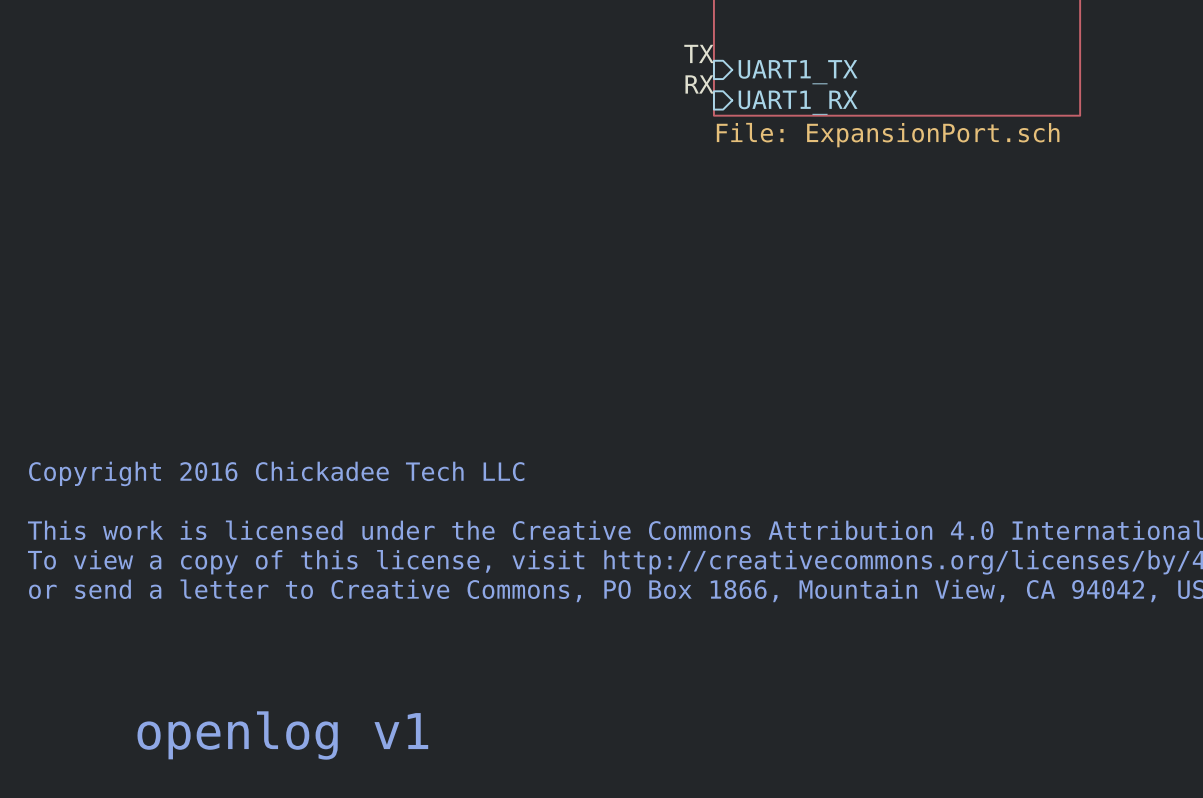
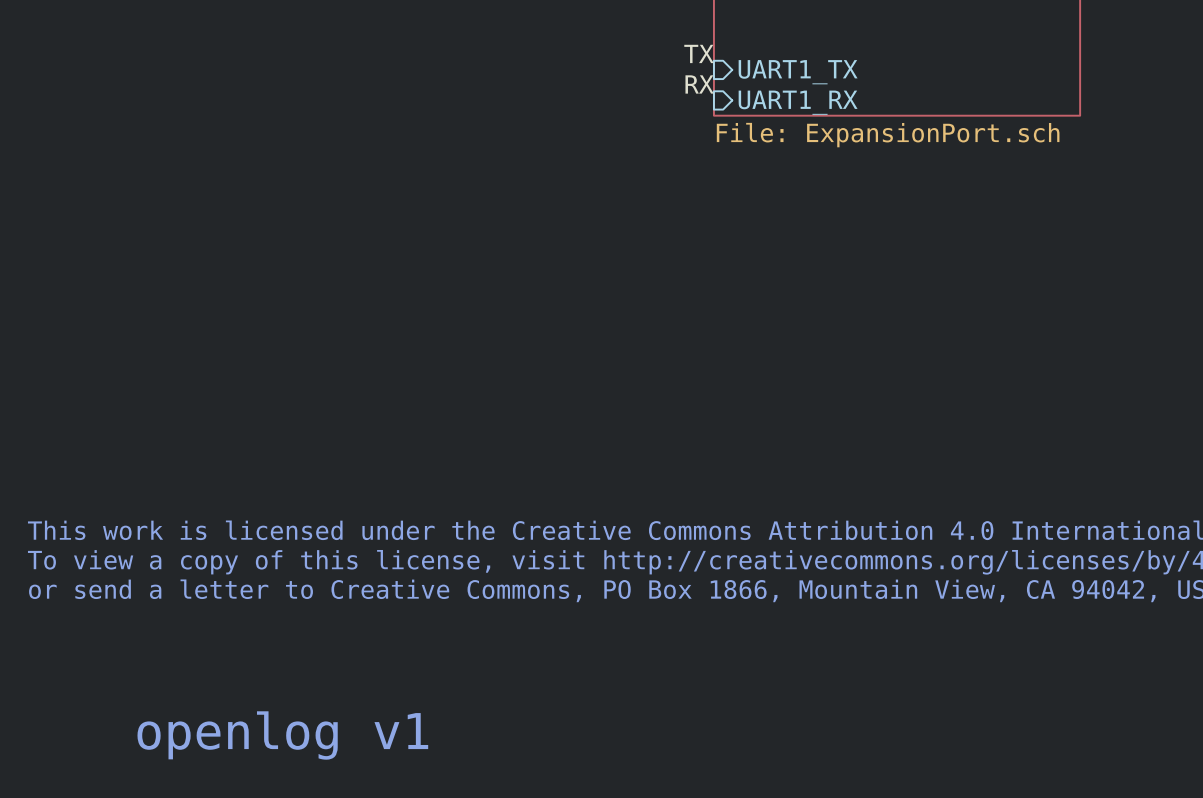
text: Copyright 2016 Chickadee Tech LLC (276, 473) -> none

